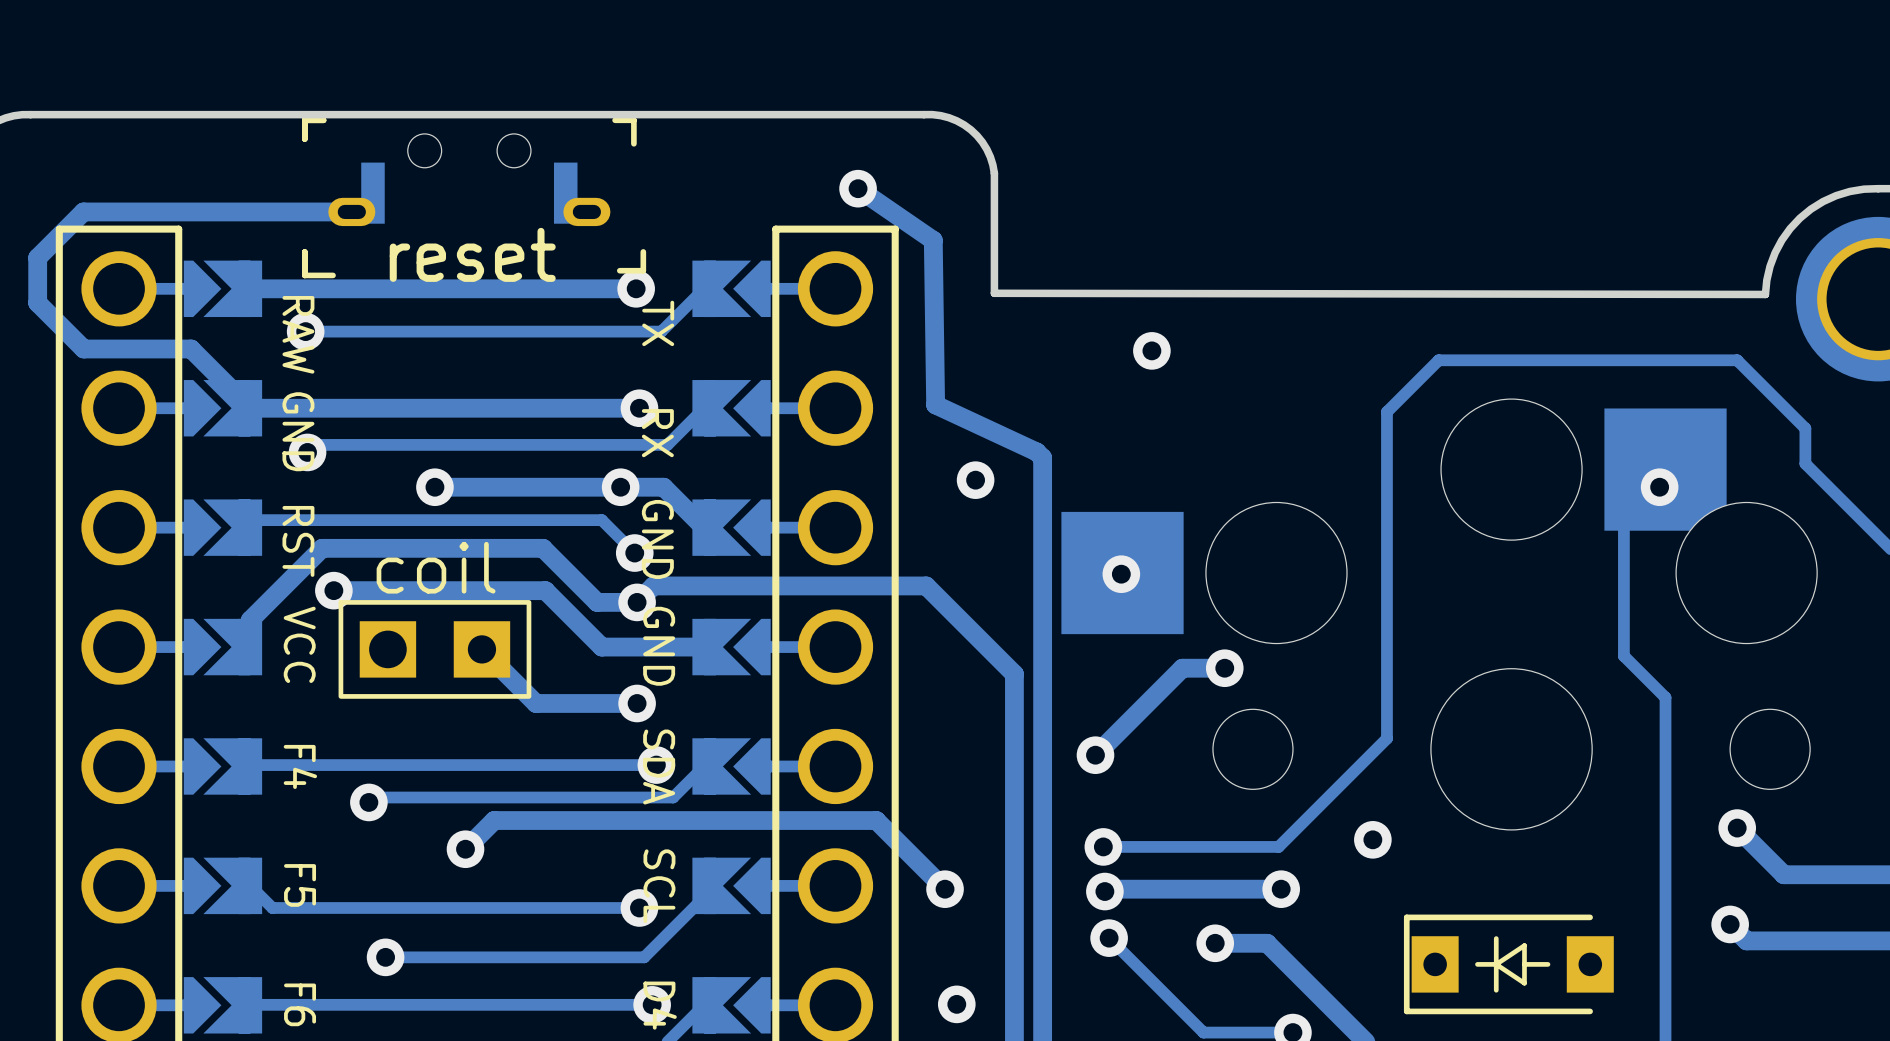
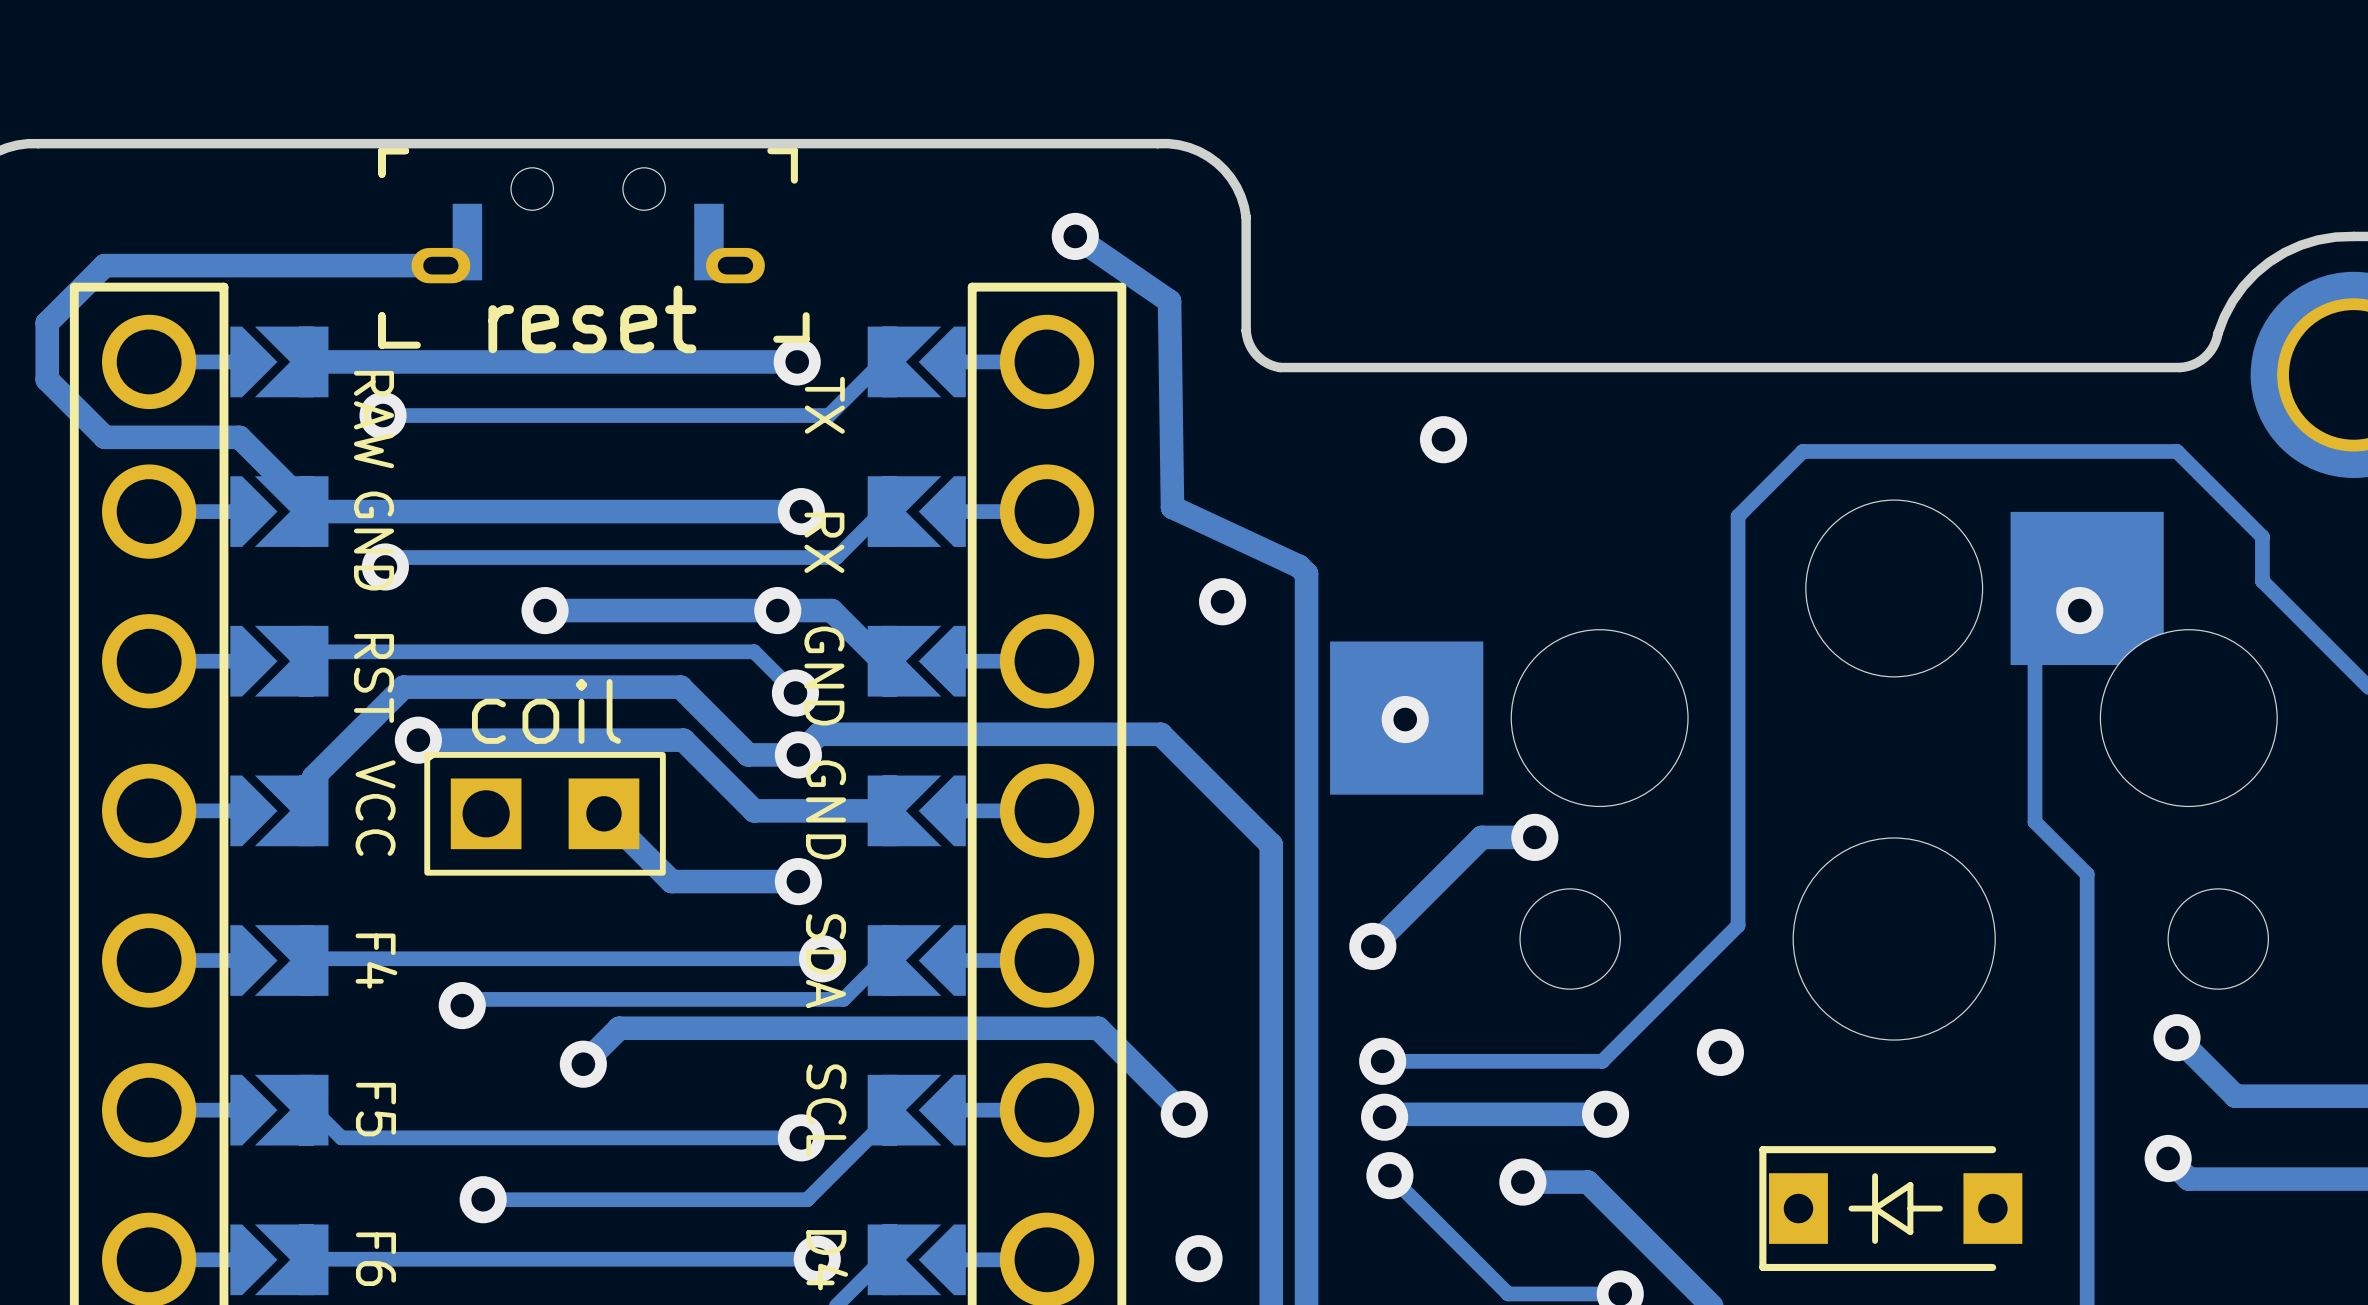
board edge: (1878, 188) (1849, 191) (1836, 195) (1823, 201) (1799, 218) (1781, 240) (1775, 252) (1766, 280) (1765, 294) (994, 293) (994, 263) -> (2353, 236) (2335, 237) (2300, 245) (2269, 262) (2243, 286) (2232, 301) (2224, 316) (2215, 342) (2208, 354) (2197, 362) (2179, 367) (1280, 367) (1267, 363) (1256, 355) (1249, 343) (1246, 330)

